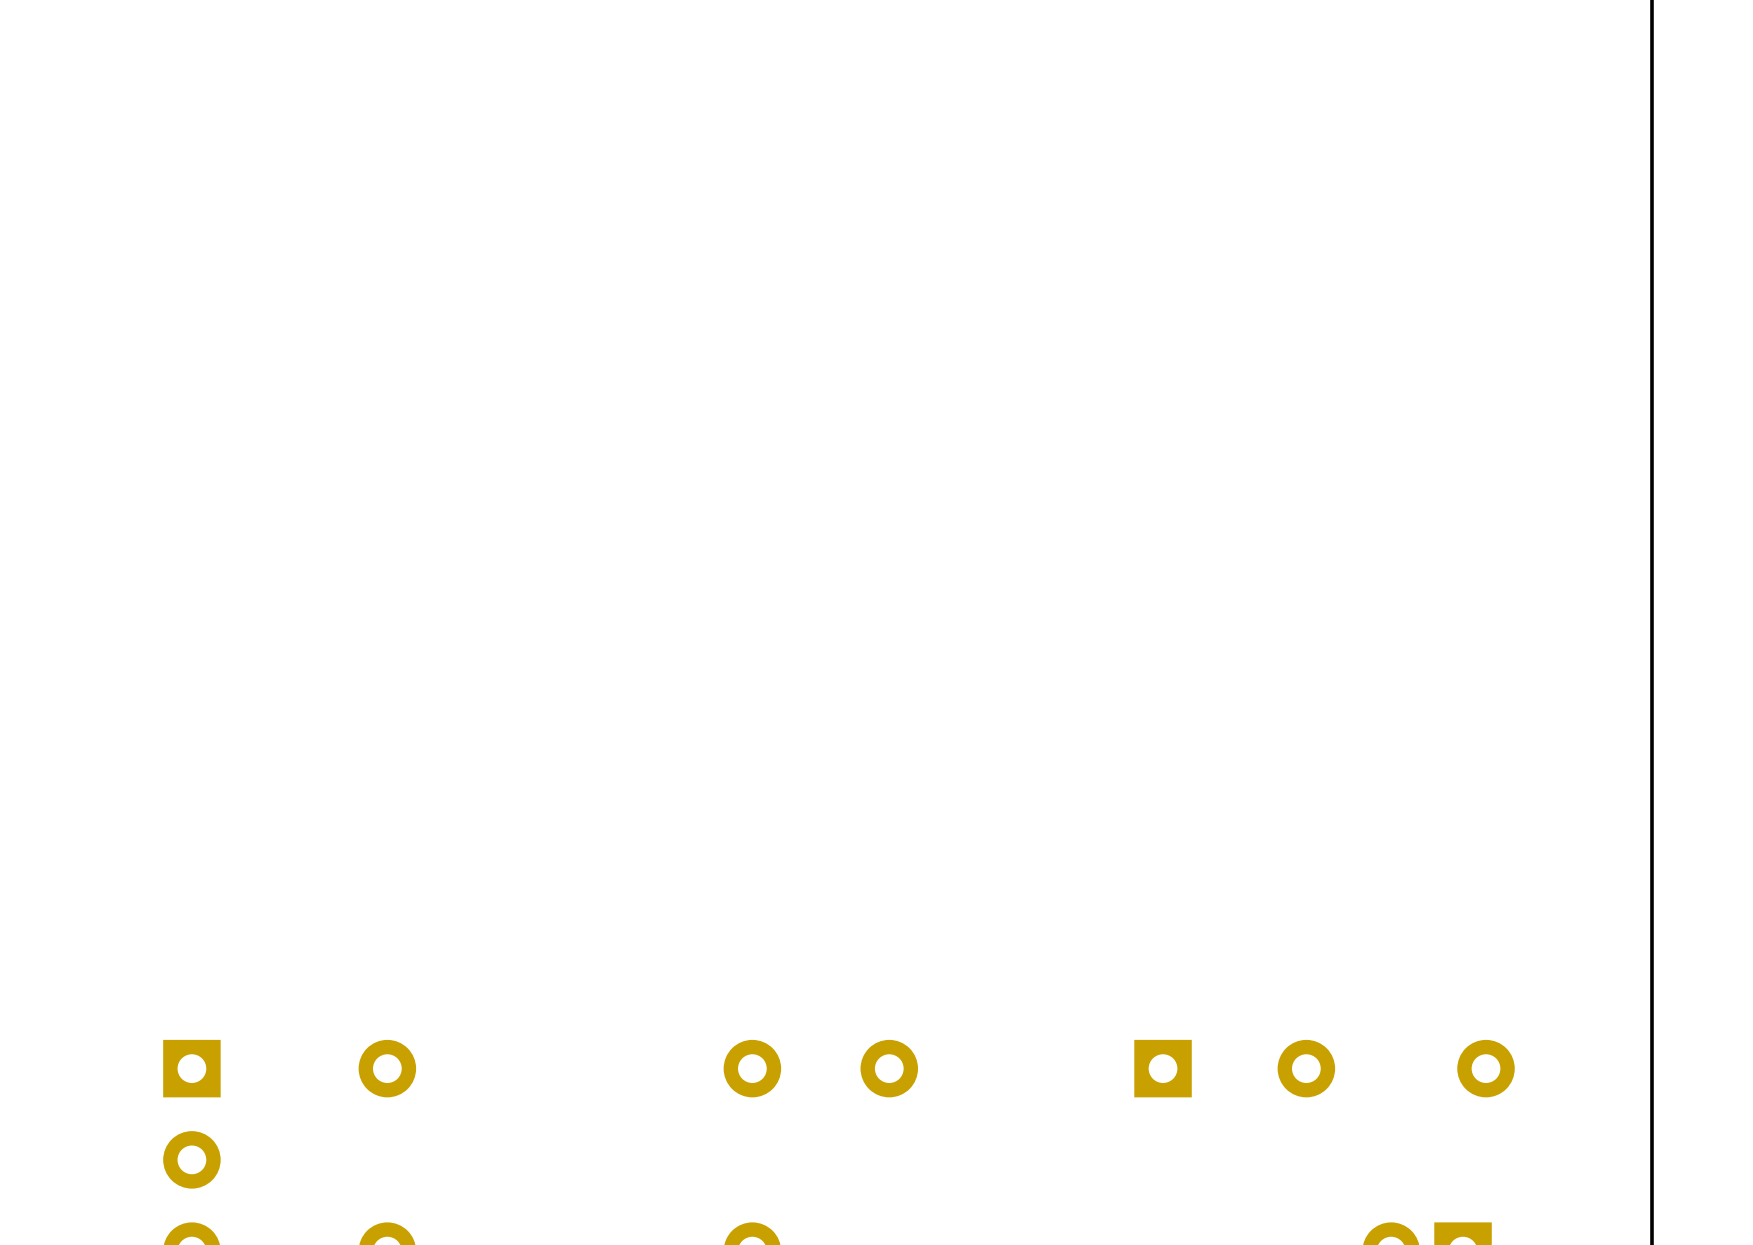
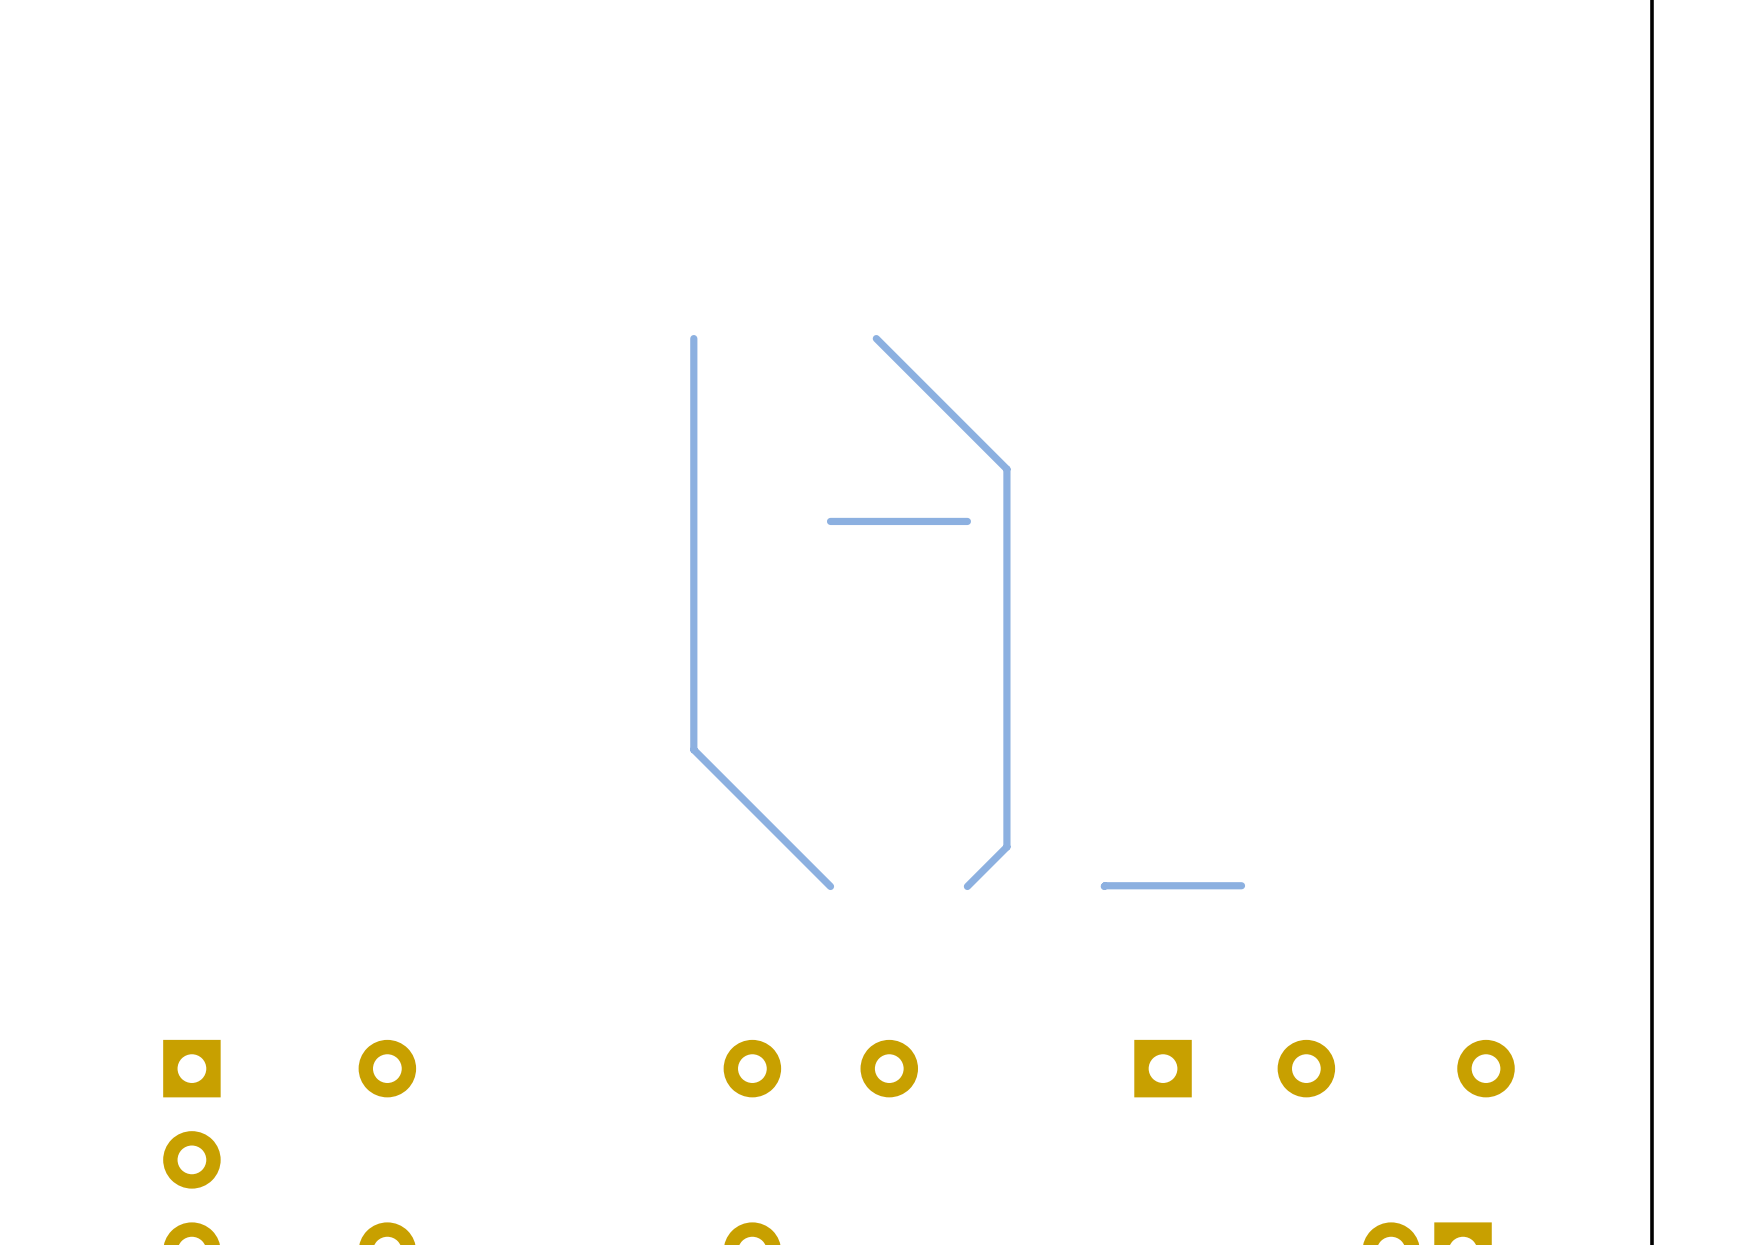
track: none -> (693, 338) (693, 749) (830, 886)
track: none -> (876, 338) (1006, 469) (1006, 846) (967, 886)
track: none -> (967, 521) (830, 521)
track: none -> (1241, 885) (1104, 886)

